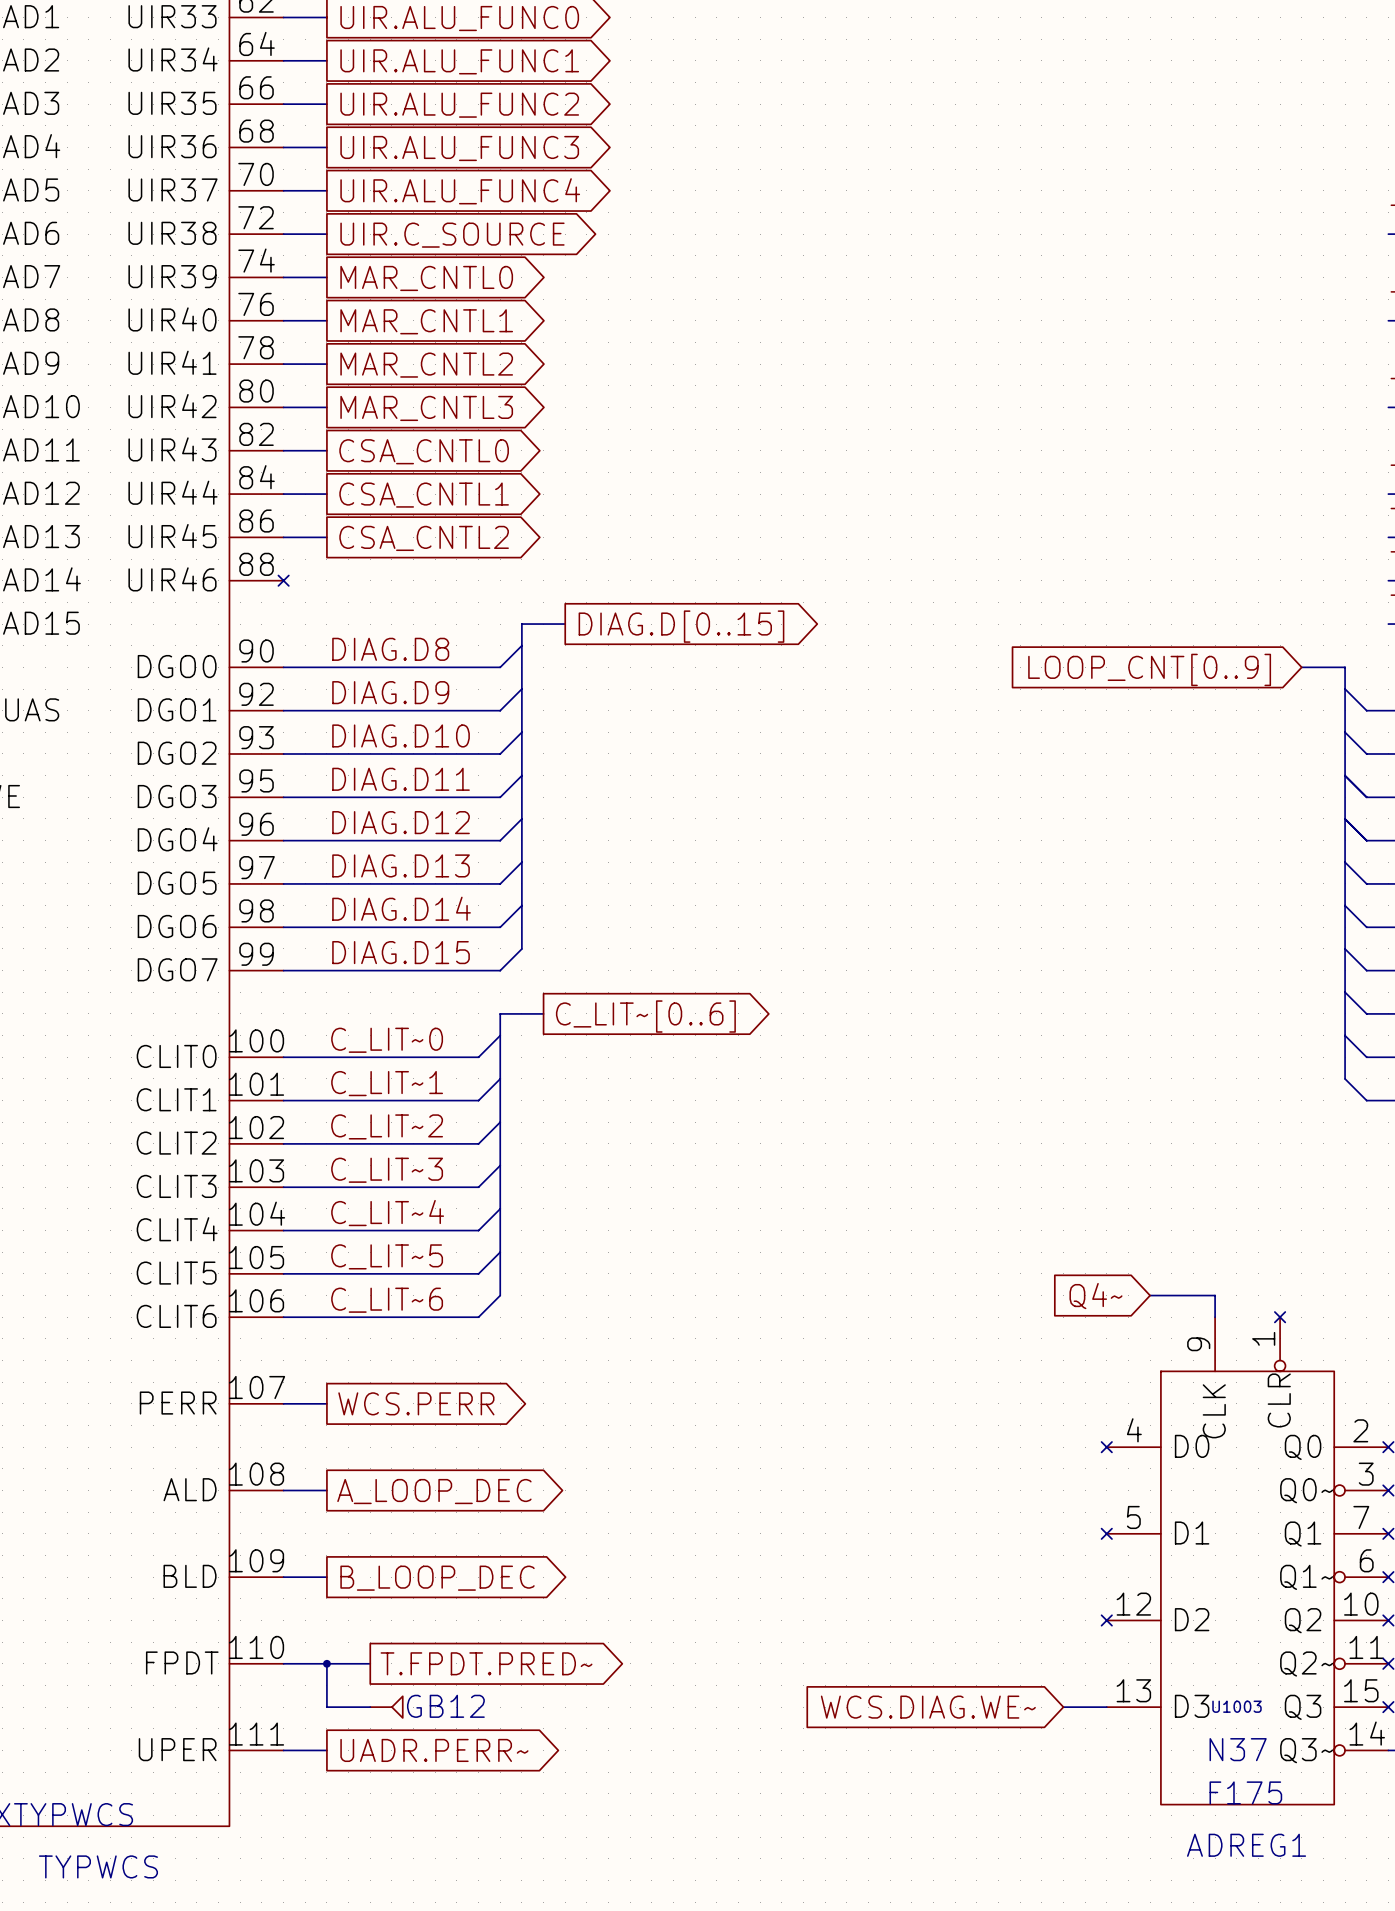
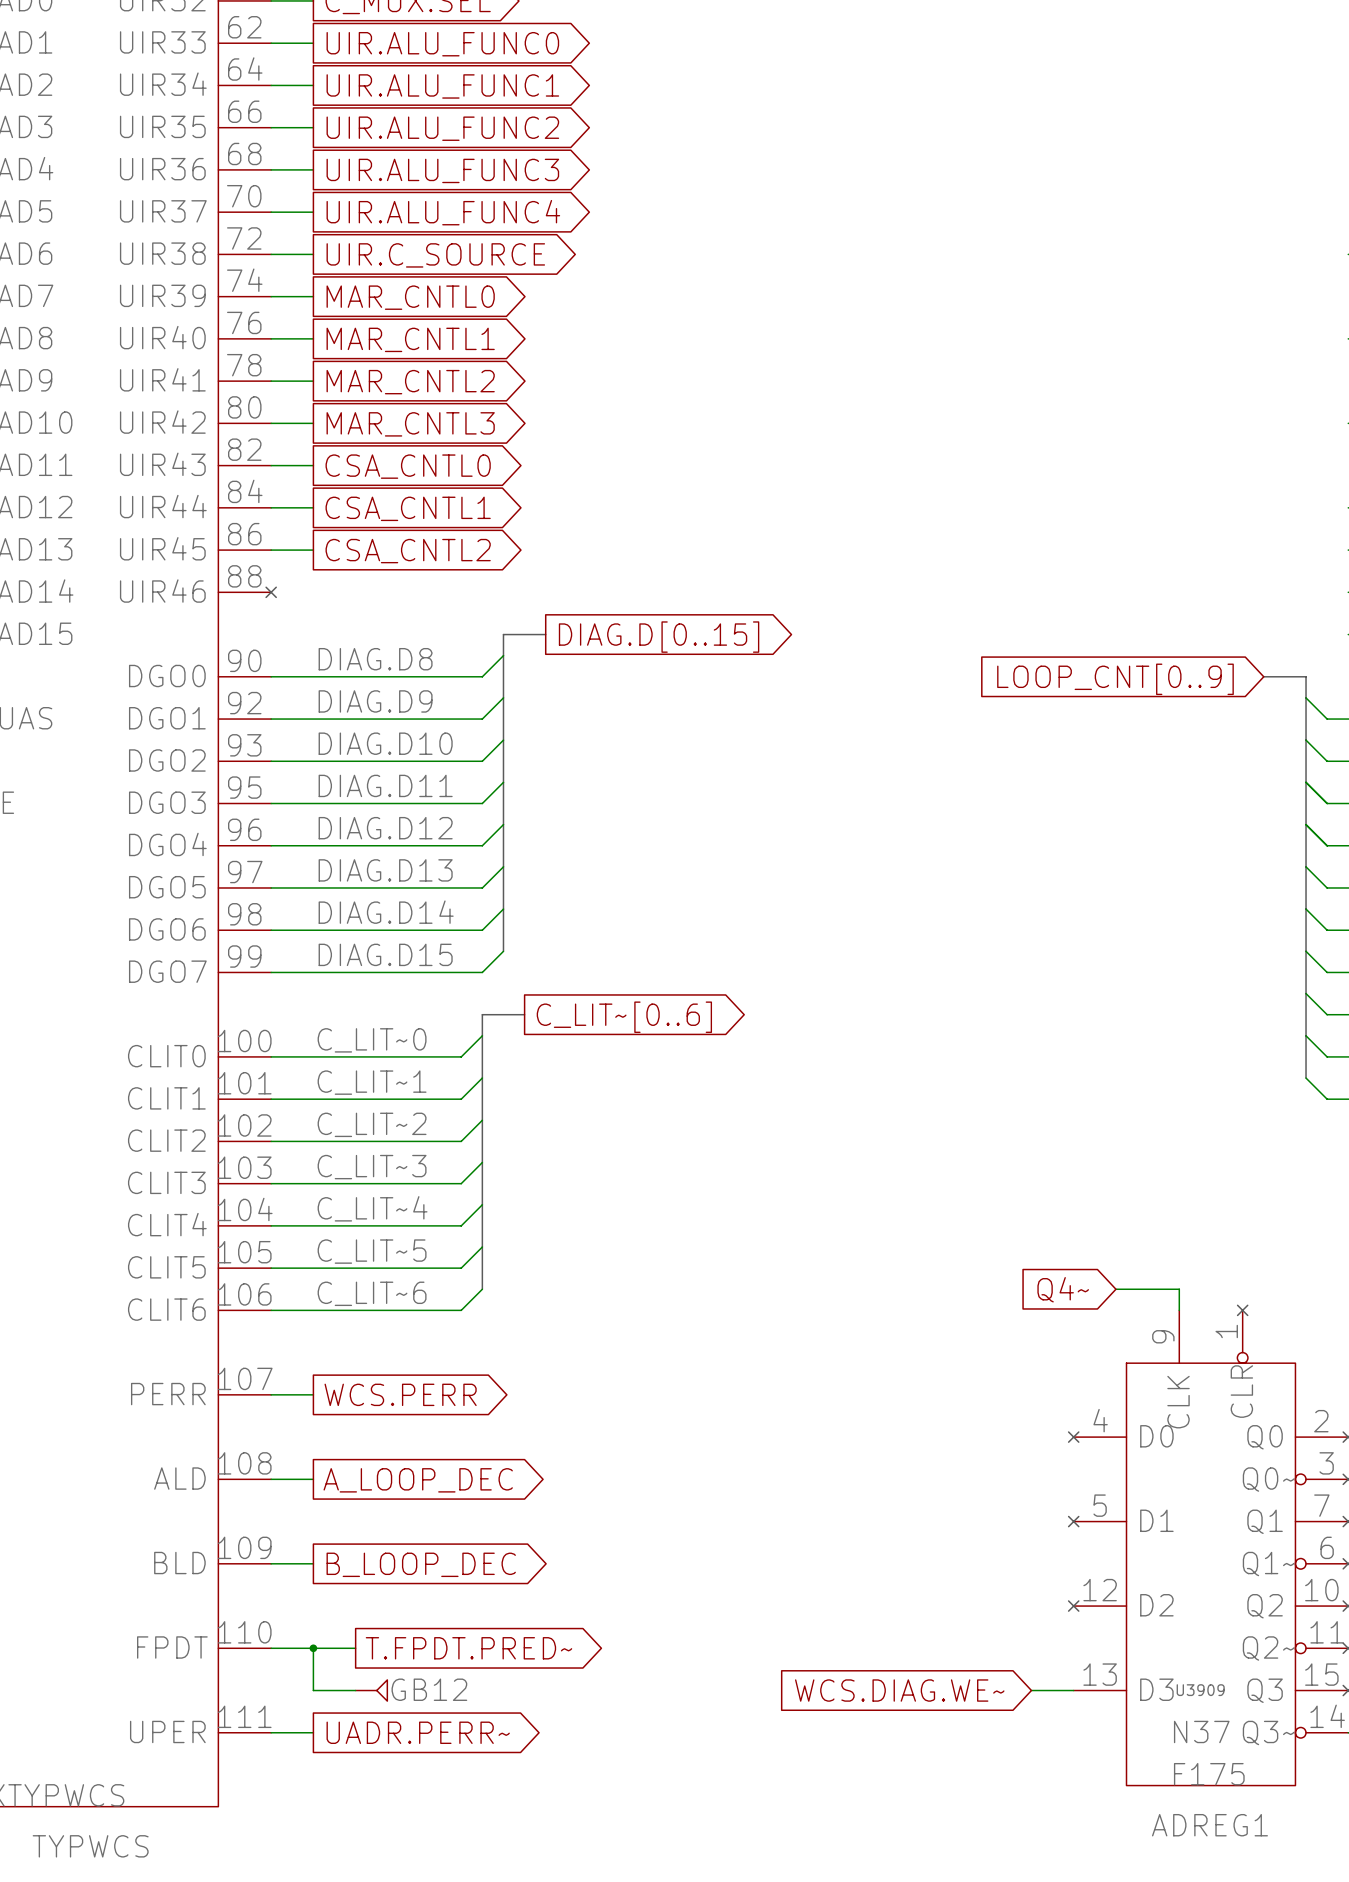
U1003 name: U1003 (1237, 1706) -> U3909 (1200, 1690)

